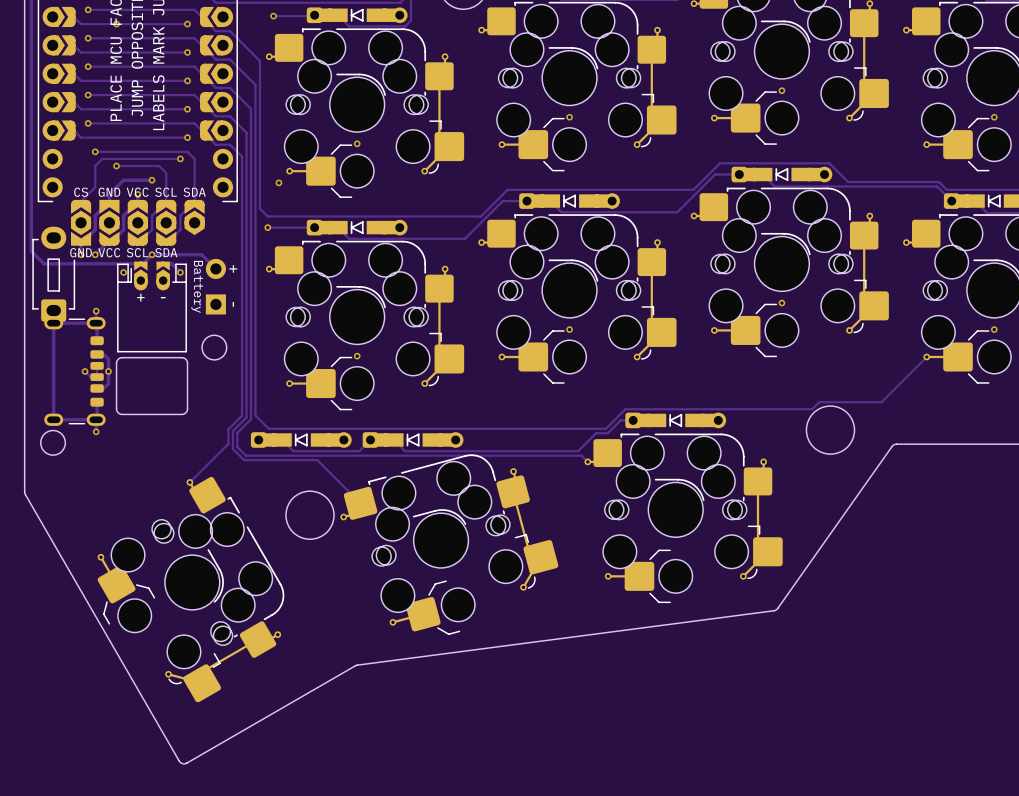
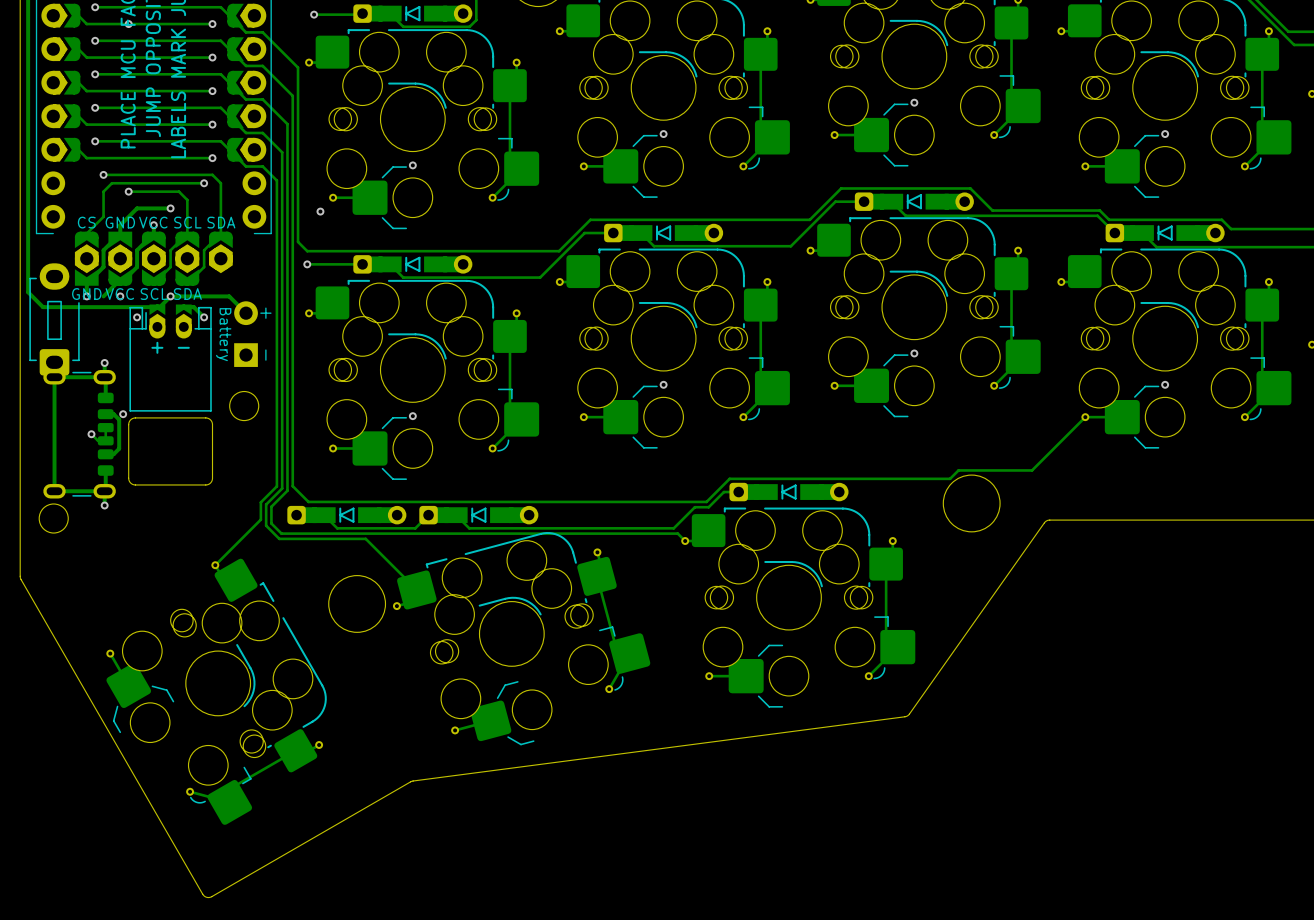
via position: (95, 254) -> (120, 296)
via position: (108, 371) -> (123, 414)

